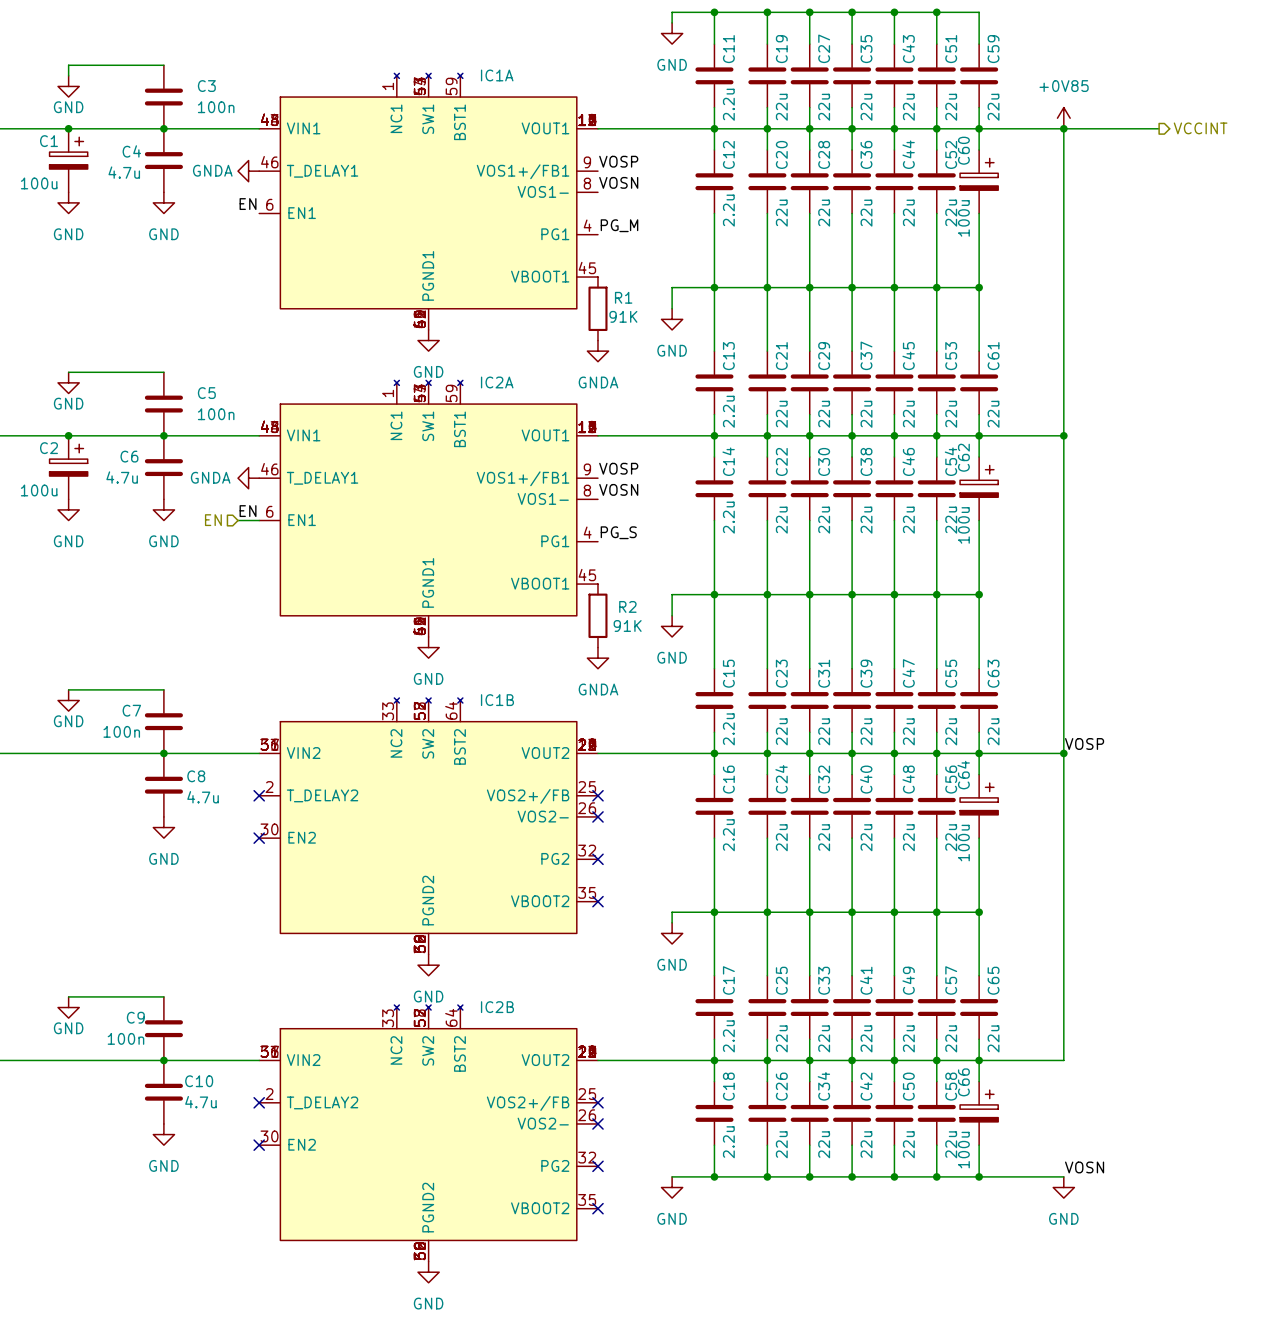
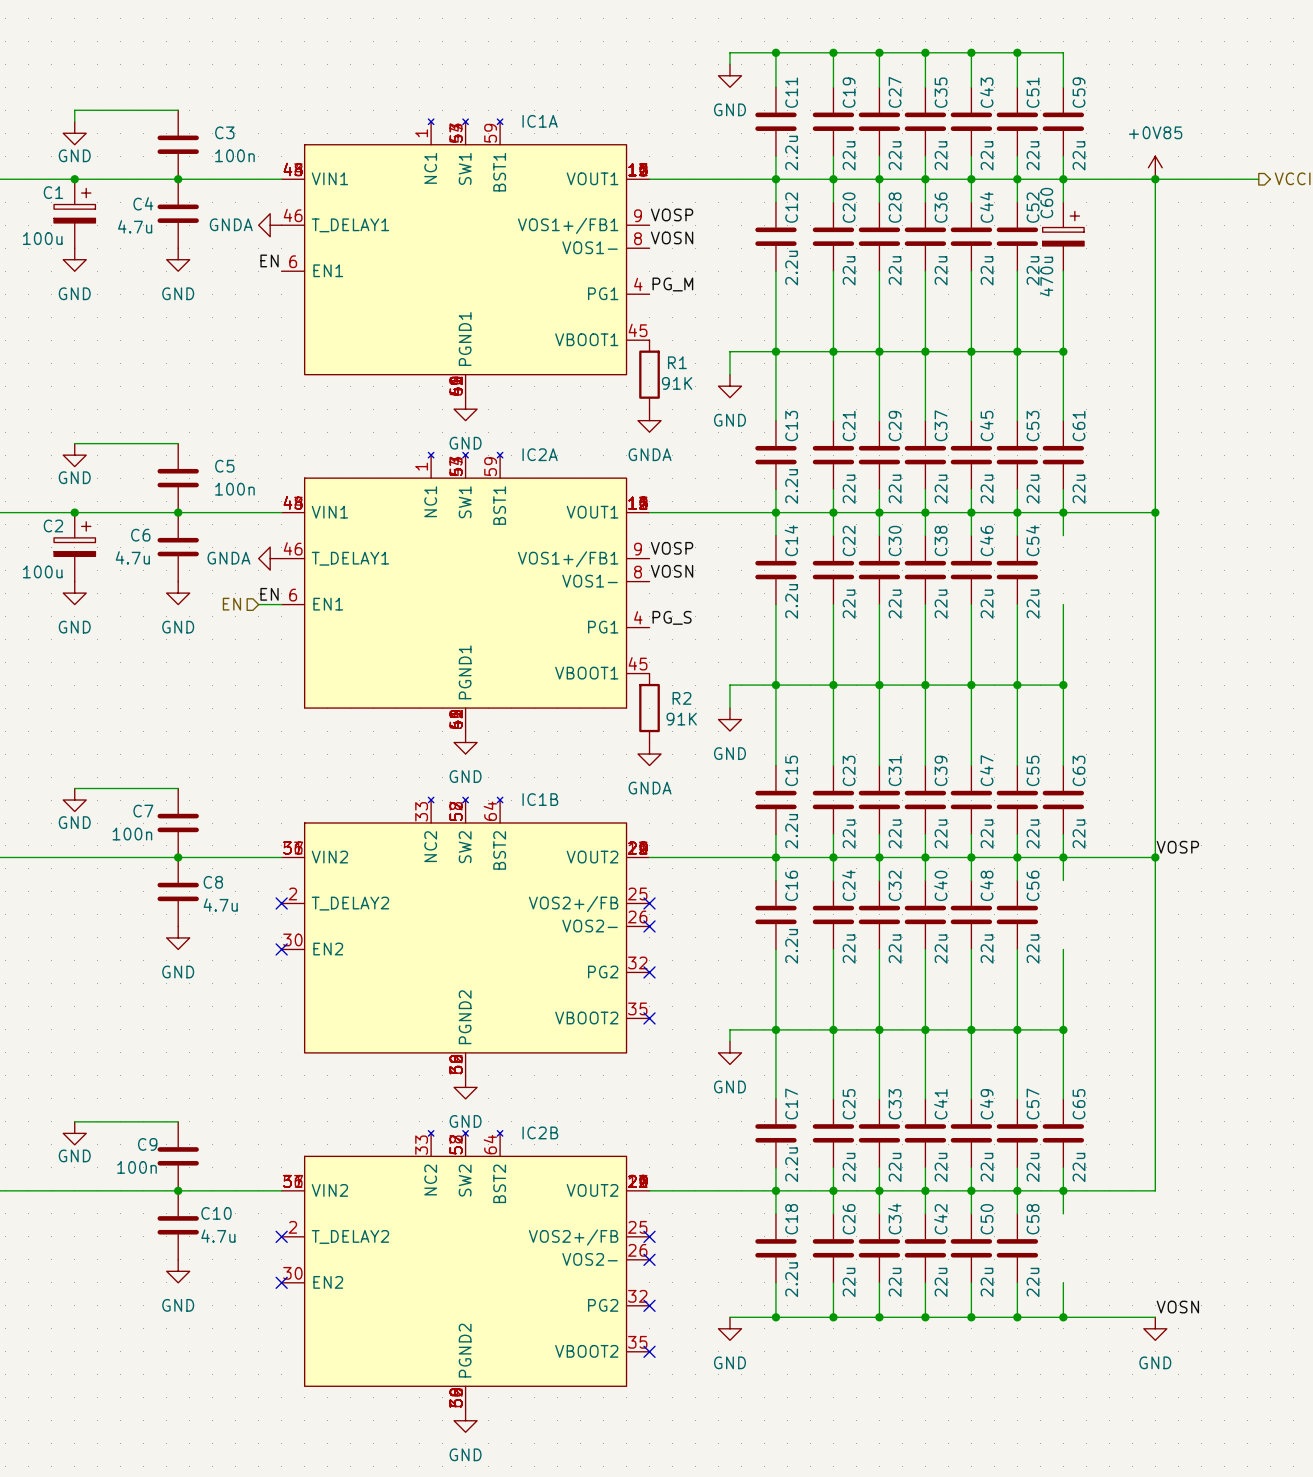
C60 value: 100u (963, 218) -> 470u (1046, 276)
C62: 100u (979, 488) -> none
C64: 100u (979, 806) -> none
C66: 100u (979, 1113) -> none

